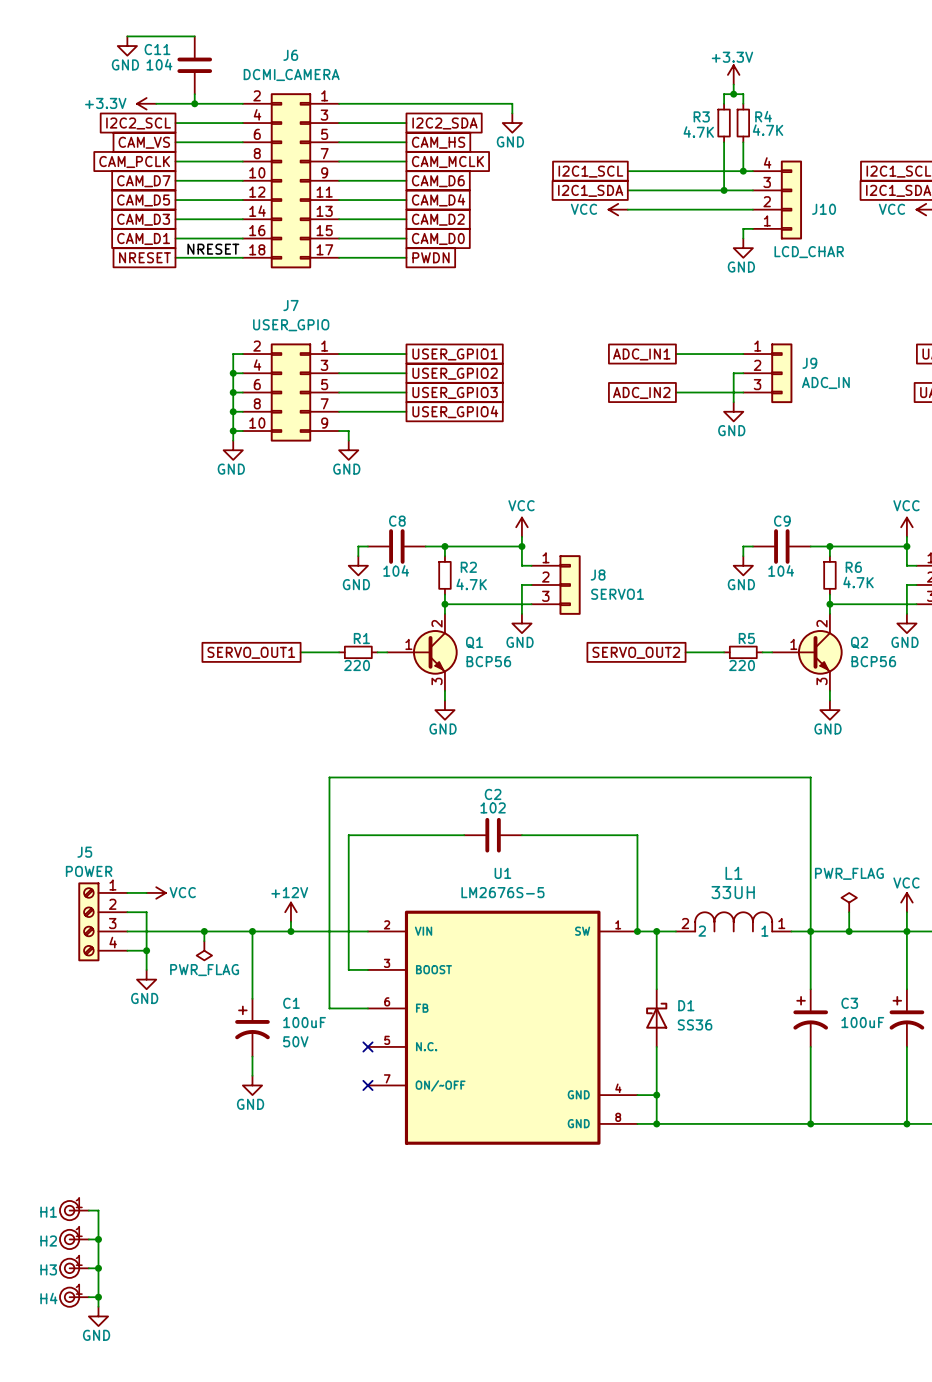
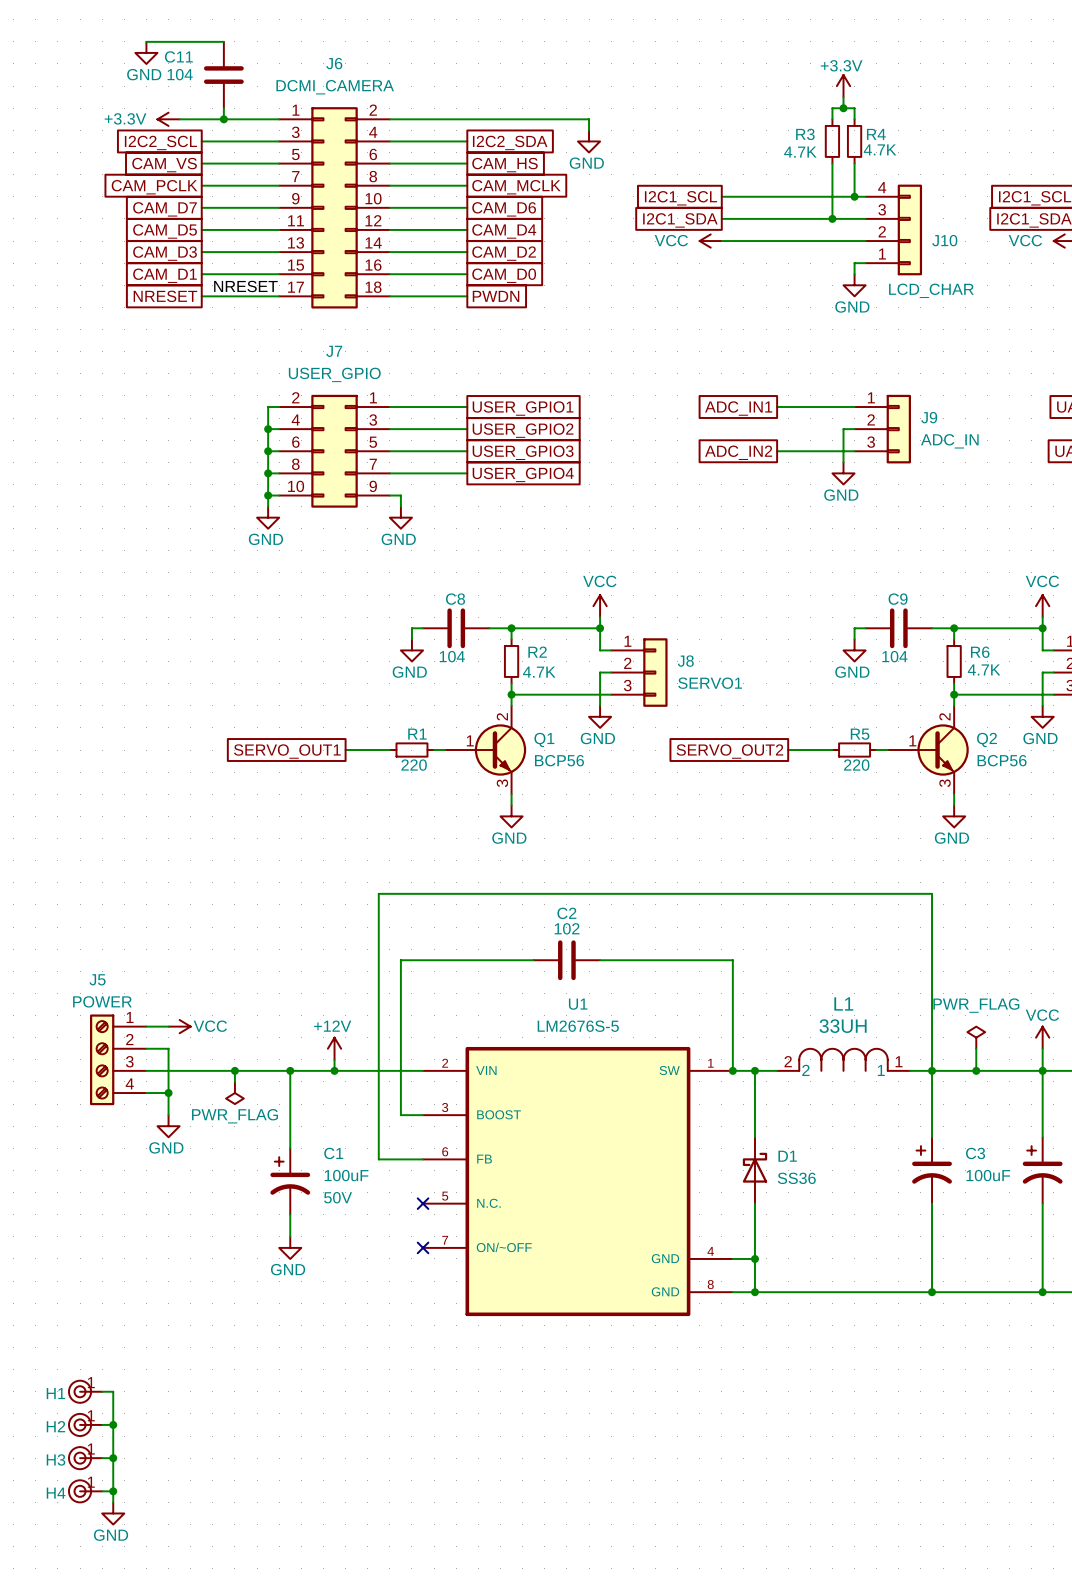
J6 flip: as is (290, 180) -> left-right (334, 207)

